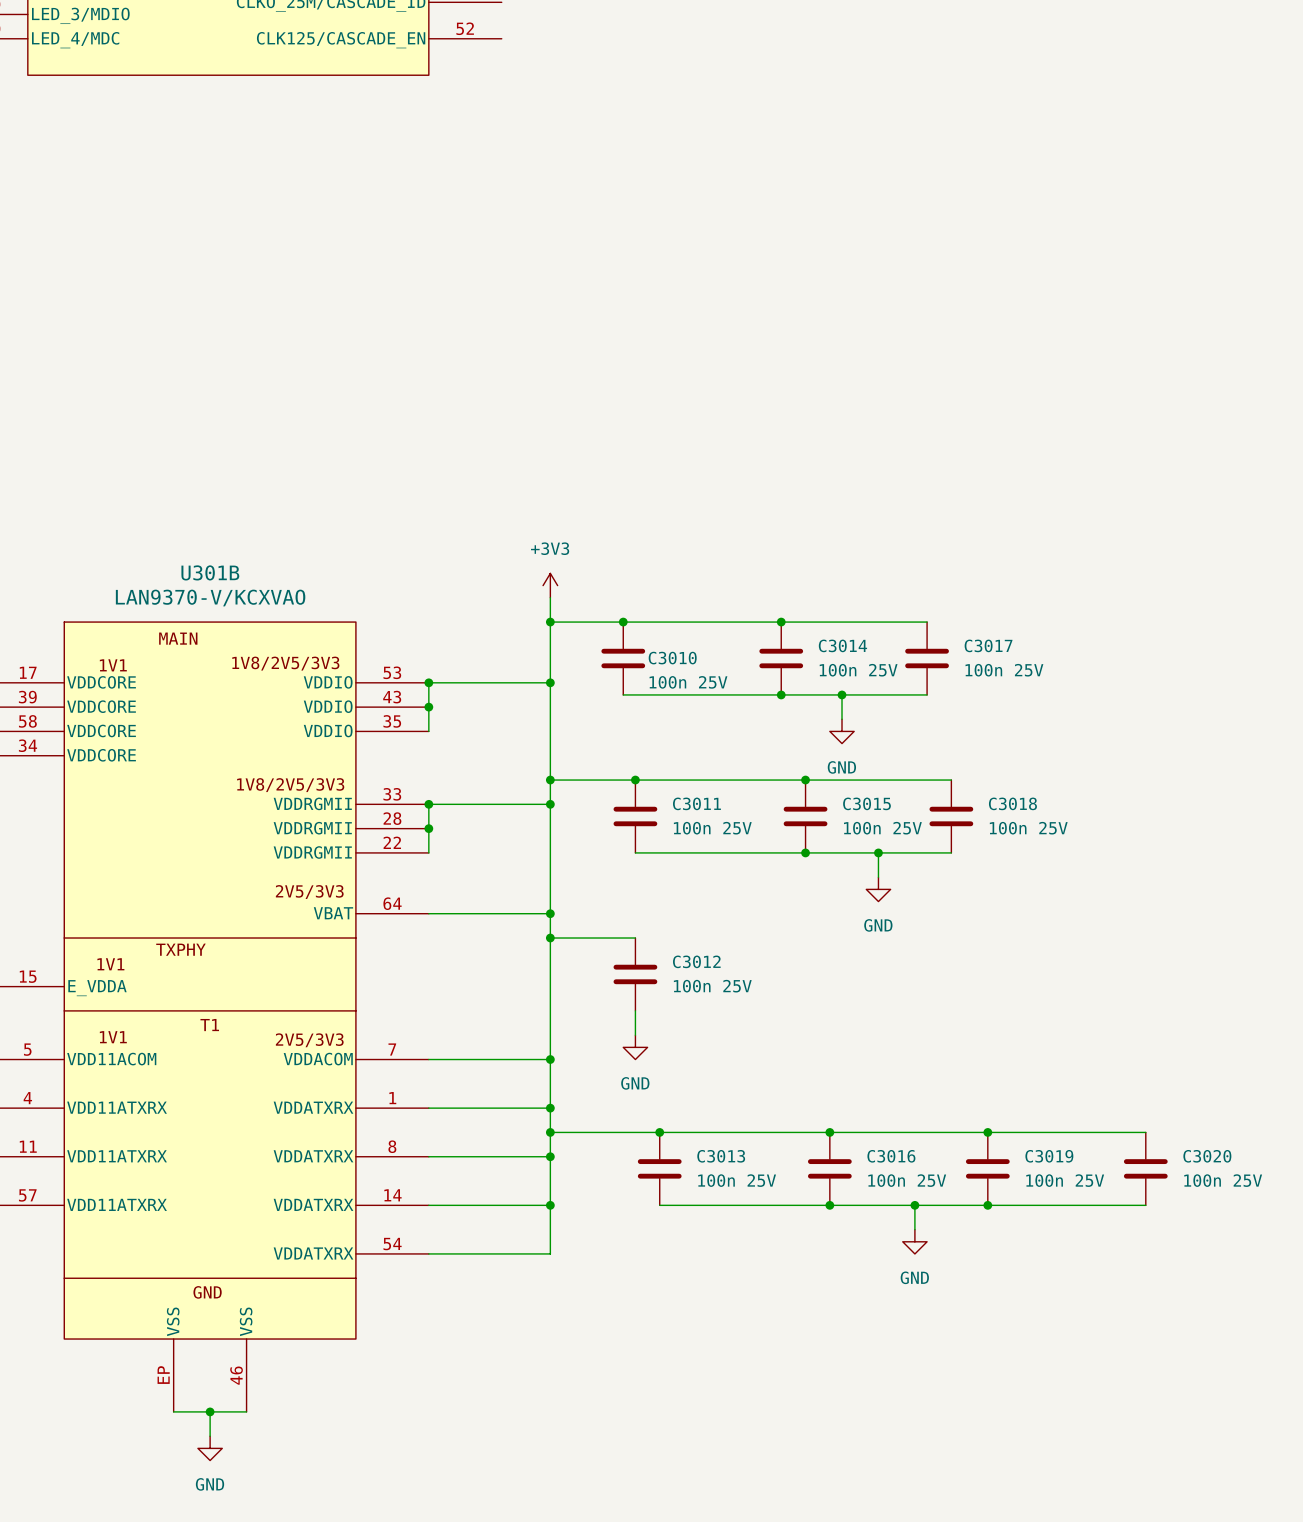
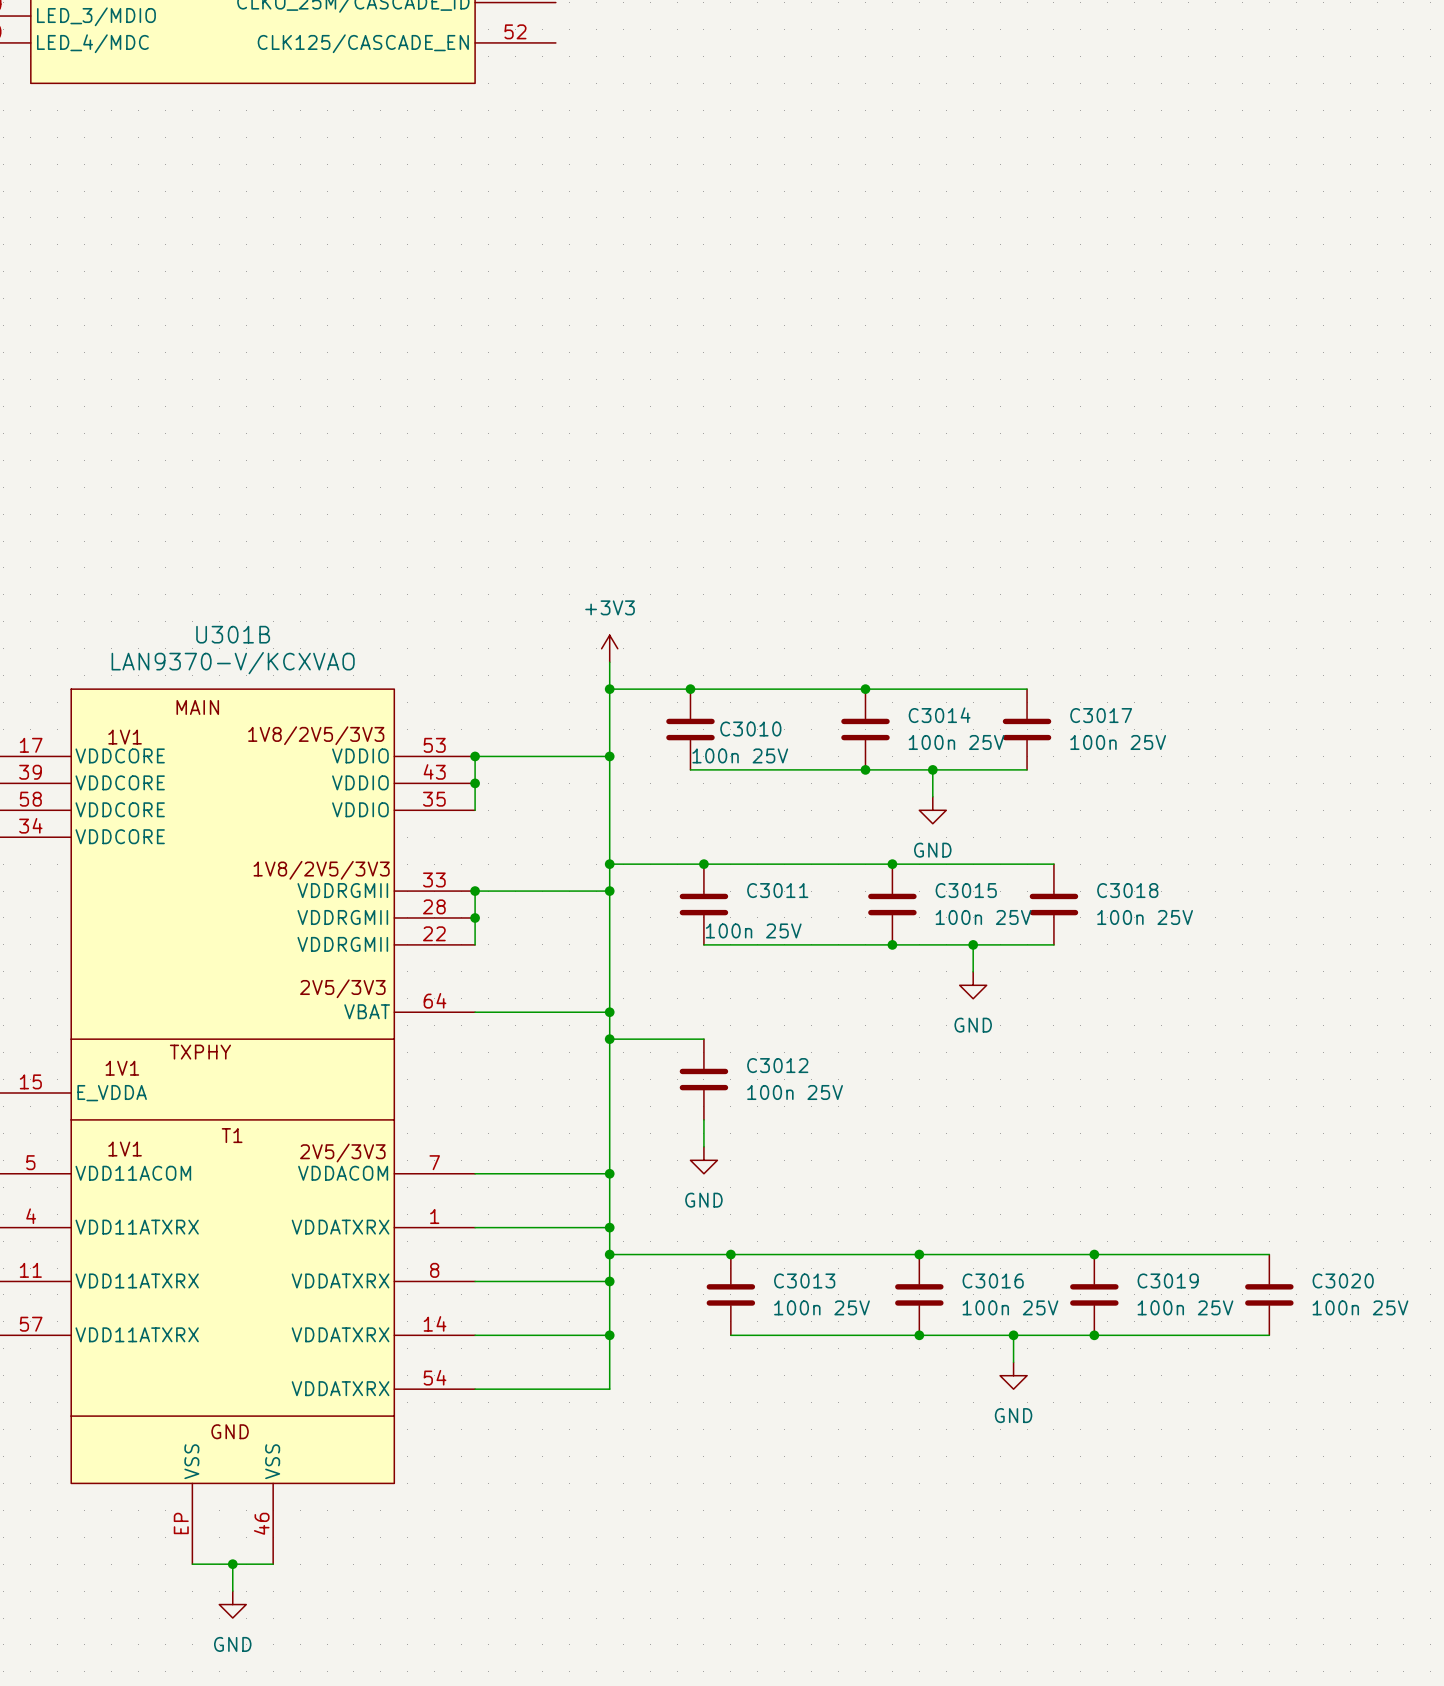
C3010 value position: 100n 25V (688, 682) -> 100n 25V (740, 755)
C3011 value position: 100n 25V (712, 828) -> 100n 25V (753, 930)

